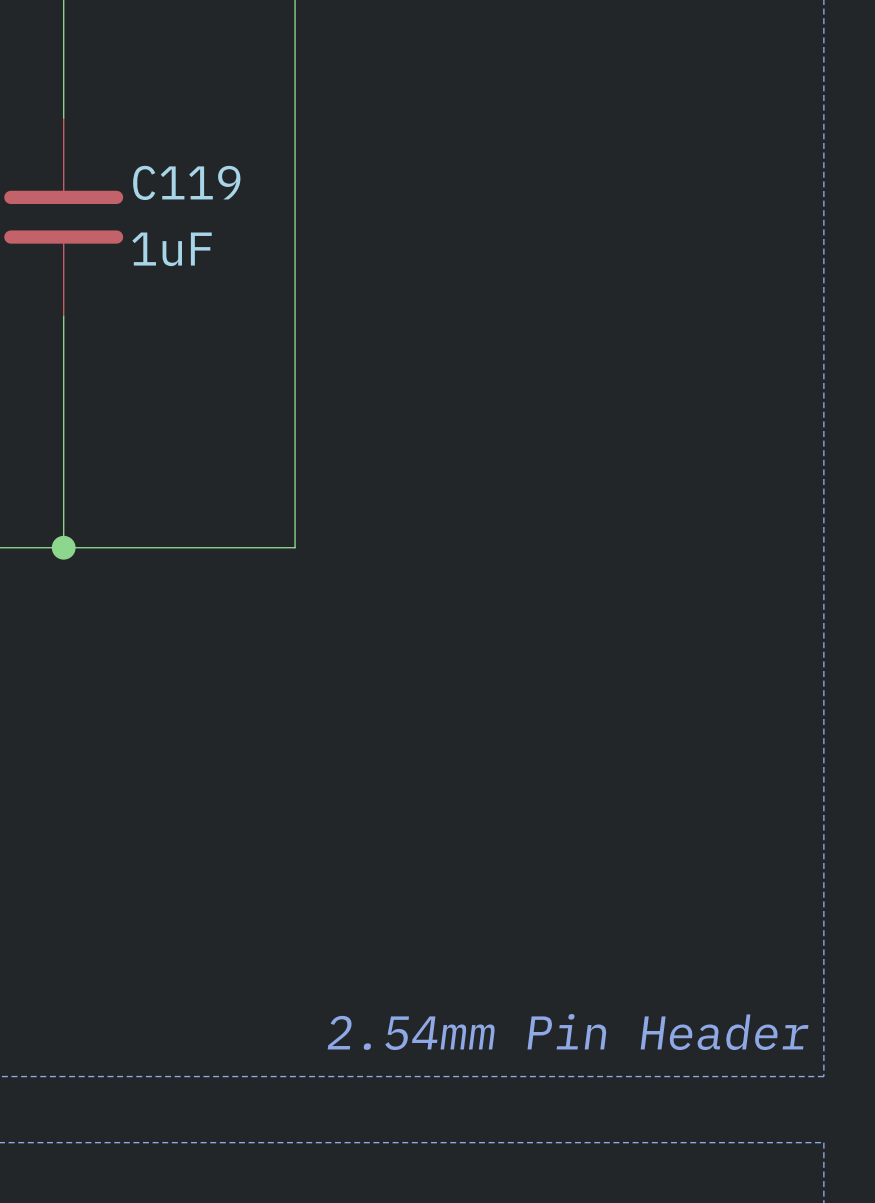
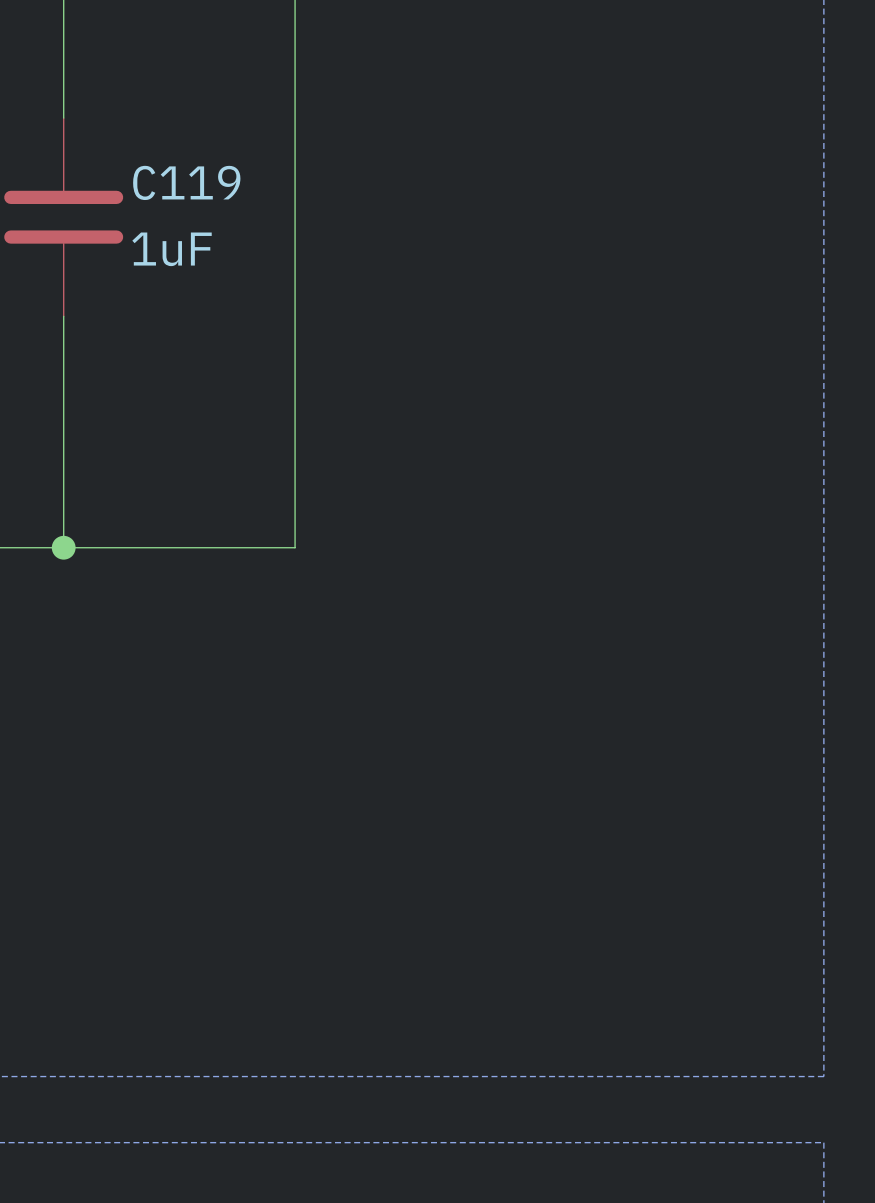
text: 2.54mm Pin Header (568, 1032) -> none

